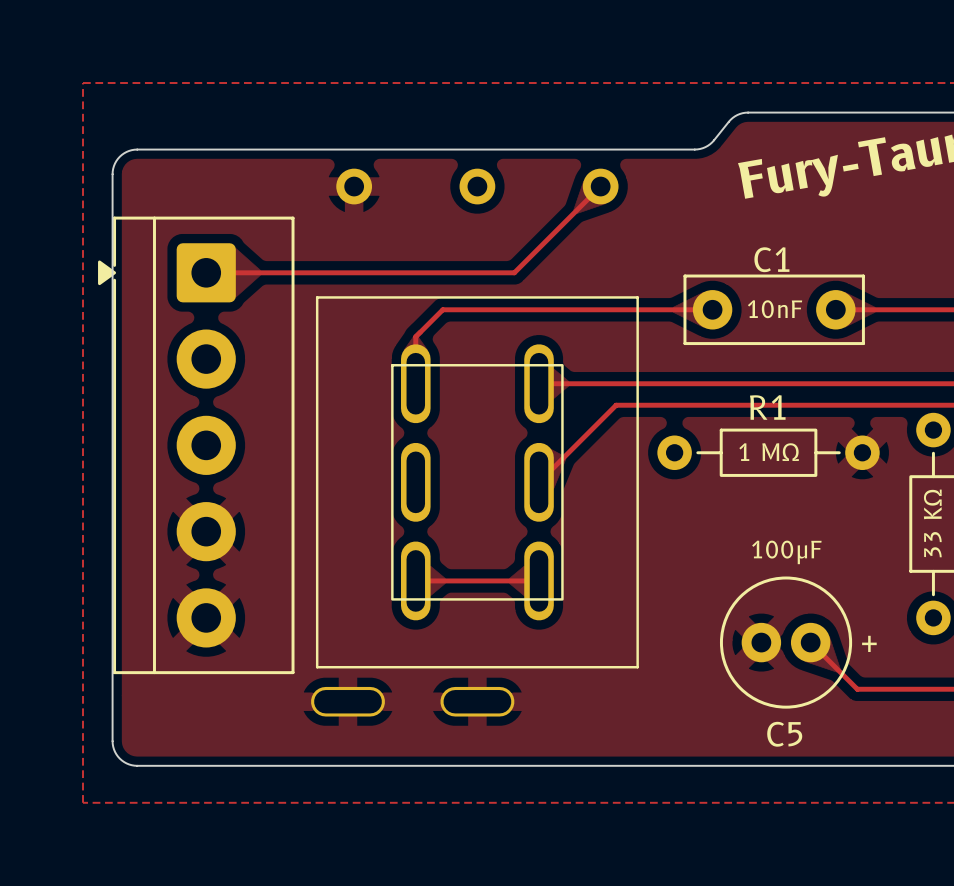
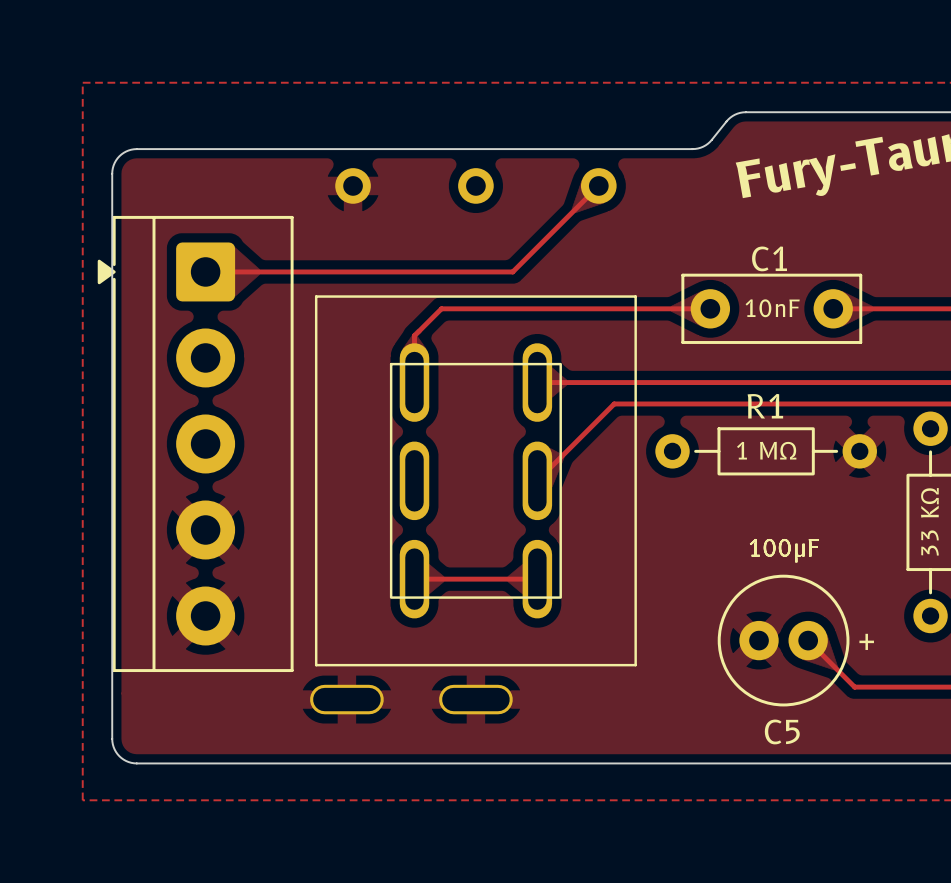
text: none -> 100μF (784, 550)

